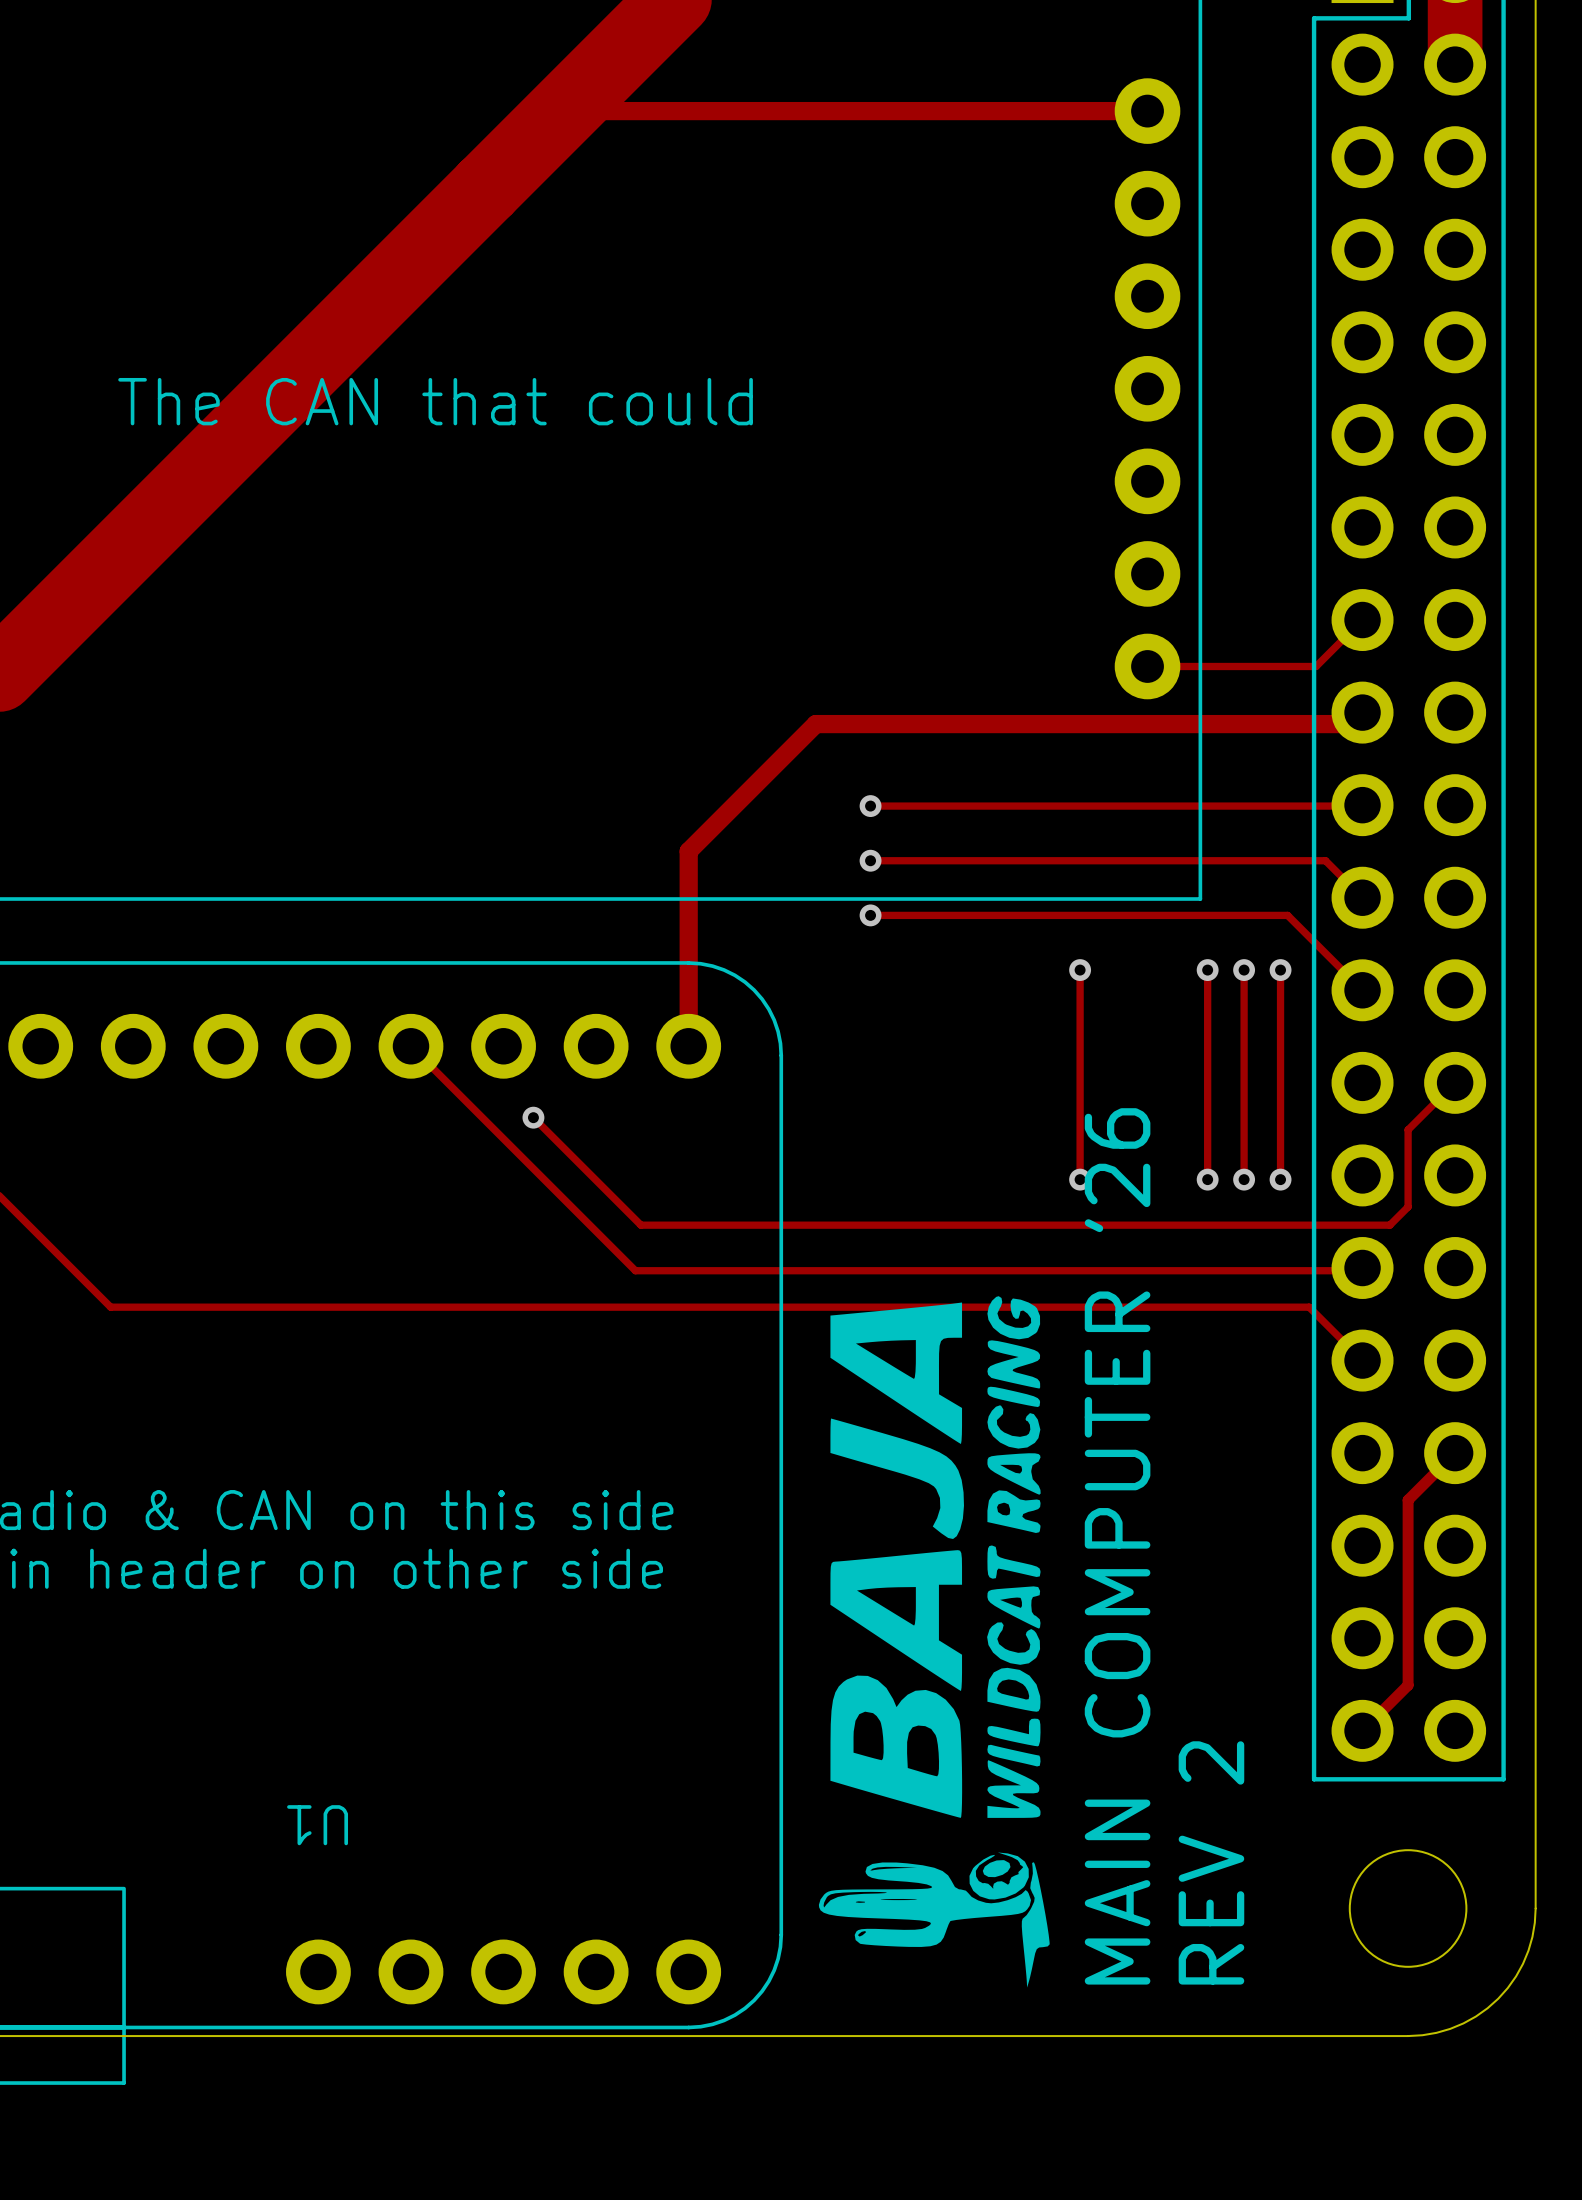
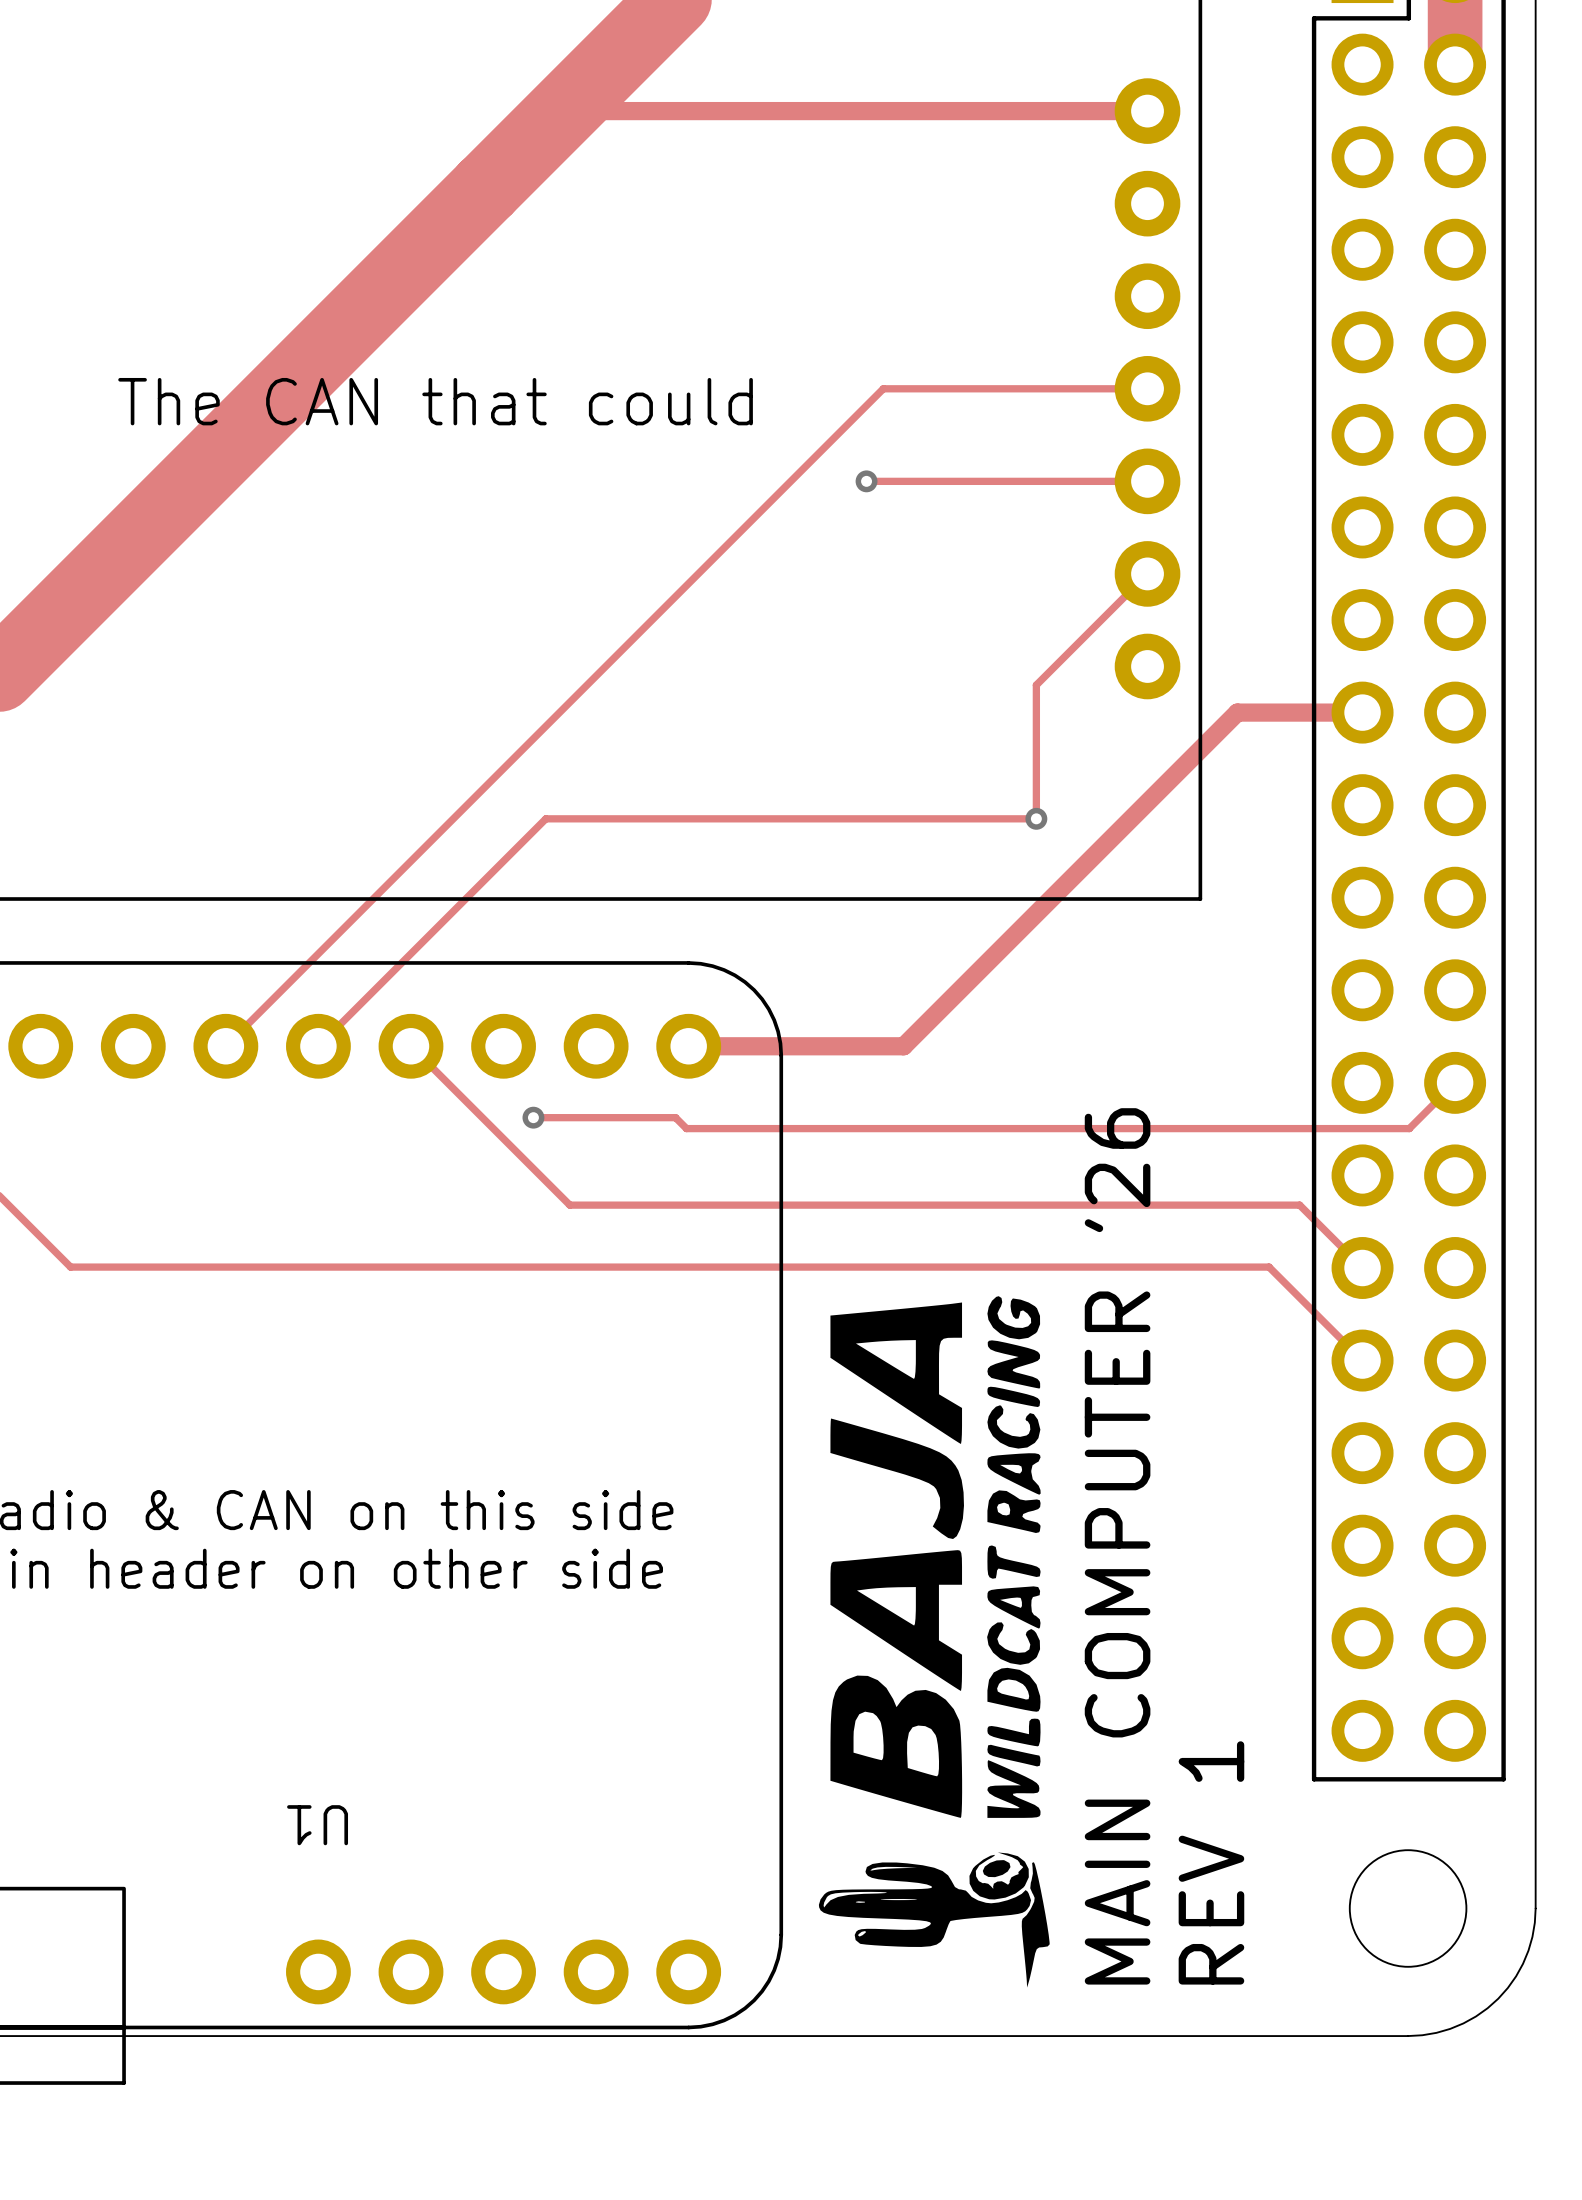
track: none -> (1147, 388) (883, 388) (225, 1046)
track: none -> (866, 481) (1147, 481)
via: none -> (866, 481)
track: none -> (1147, 573) (1036, 685) (1036, 818) (545, 818) (318, 1046)
track: (1362, 620) (1316, 666) (1147, 666) -> none
track: (1362, 712) (1351, 724) (815, 724) (688, 851) (688, 1046) -> (1362, 712) (1237, 712) (903, 1046) (688, 1046)
track: (1362, 805) (870, 806) -> none
via: (870, 806) -> none
via: none -> (1036, 818)
track: (870, 860) (1325, 860) (1362, 897) -> none
via: (870, 860) -> none
track: (870, 915) (1287, 915) (1362, 990) -> none
via: (870, 915) -> none
track: (1080, 970) (1080, 1179) -> none
via: (1080, 970) -> none
track: (1207, 970) (1207, 1179) -> none
via: (1207, 970) -> none
track: (1244, 970) (1244, 1179) -> none
via: (1244, 970) -> none
track: (1280, 970) (1280, 1179) -> none
via: (1280, 970) -> none
track: (533, 1117) (640, 1225) (1389, 1225) (1408, 1206) (1409, 1128) -> (533, 1117) (675, 1117) (686, 1128) (1409, 1128)
via: (1080, 1179) -> none
via: (1207, 1179) -> none
via: (1244, 1179) -> none
via: (1280, 1179) -> none
track: (569, 1205) (635, 1270) (1359, 1270) (1362, 1268) -> (569, 1205) (1299, 1205) (1362, 1268)
track: (70, 1267) (110, 1307) (1309, 1307) -> (70, 1267) (1269, 1267) (1309, 1307)
track: (1455, 1453) (1408, 1500) (1408, 1685) (1362, 1730) -> none
text: REV 2 (1211, 1862) -> REV 1 (1211, 1862)

